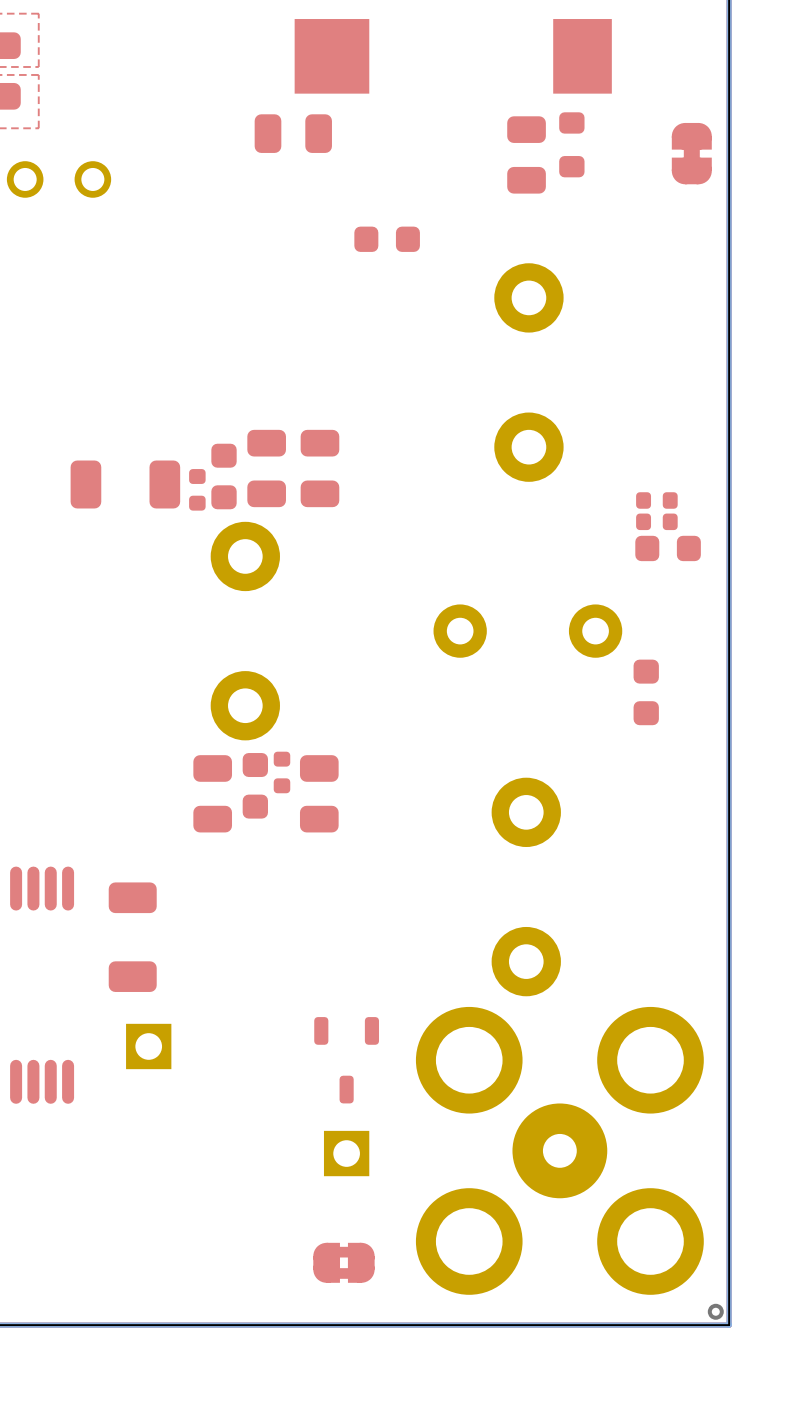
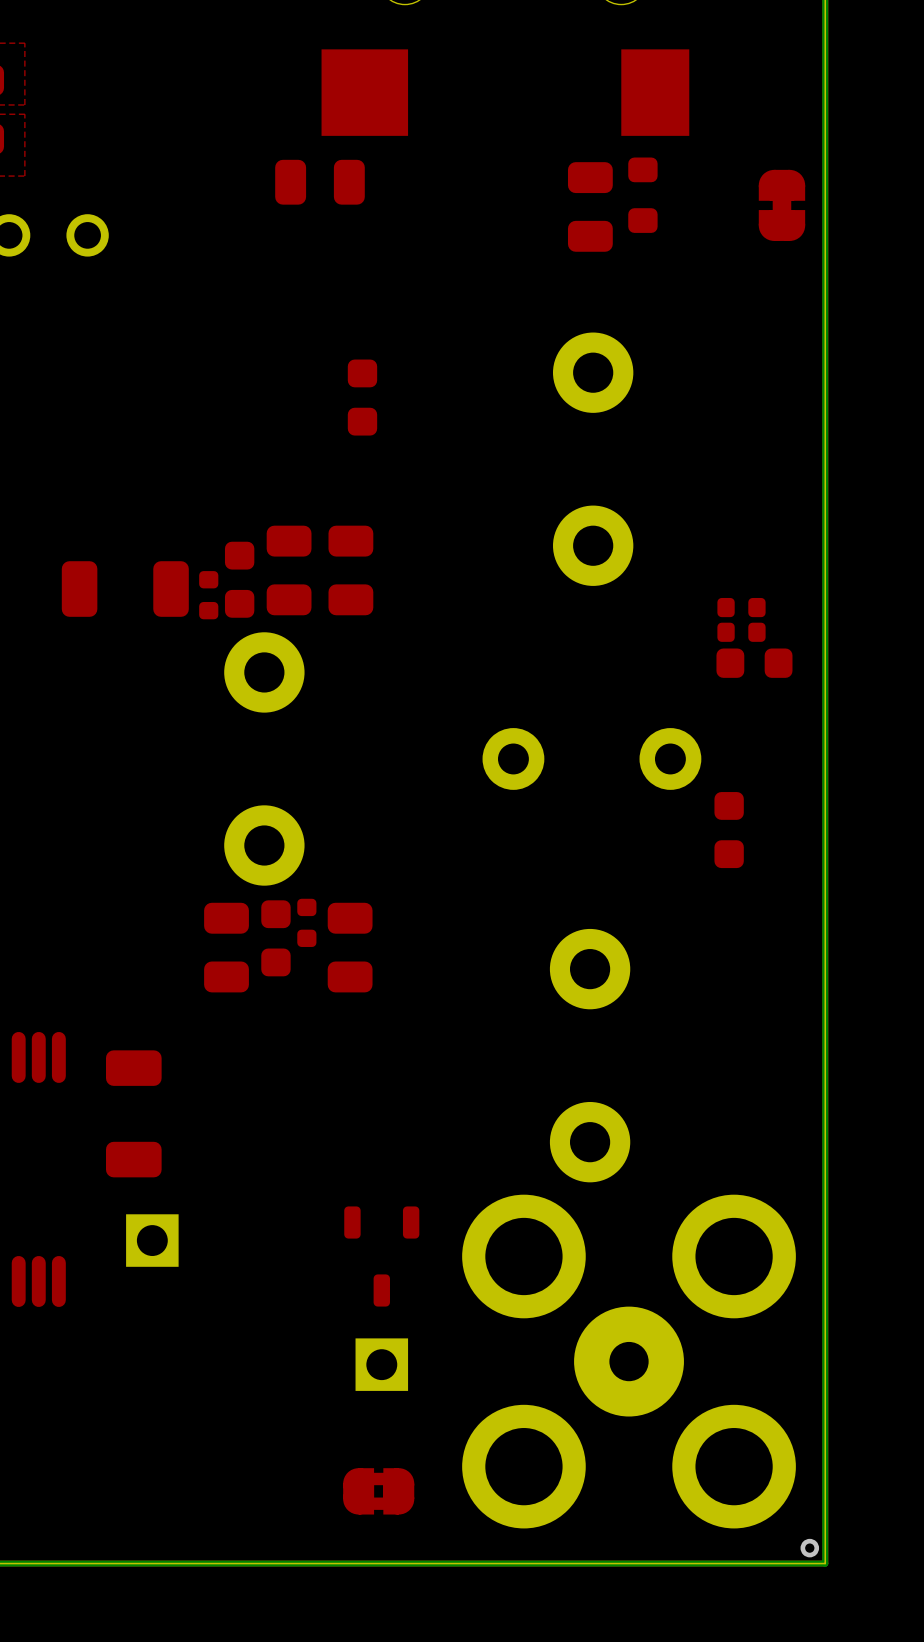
part rotation: 0° (387, 239) -> 90° clockwise (362, 397)
part position: (387, 239) -> (362, 397)

